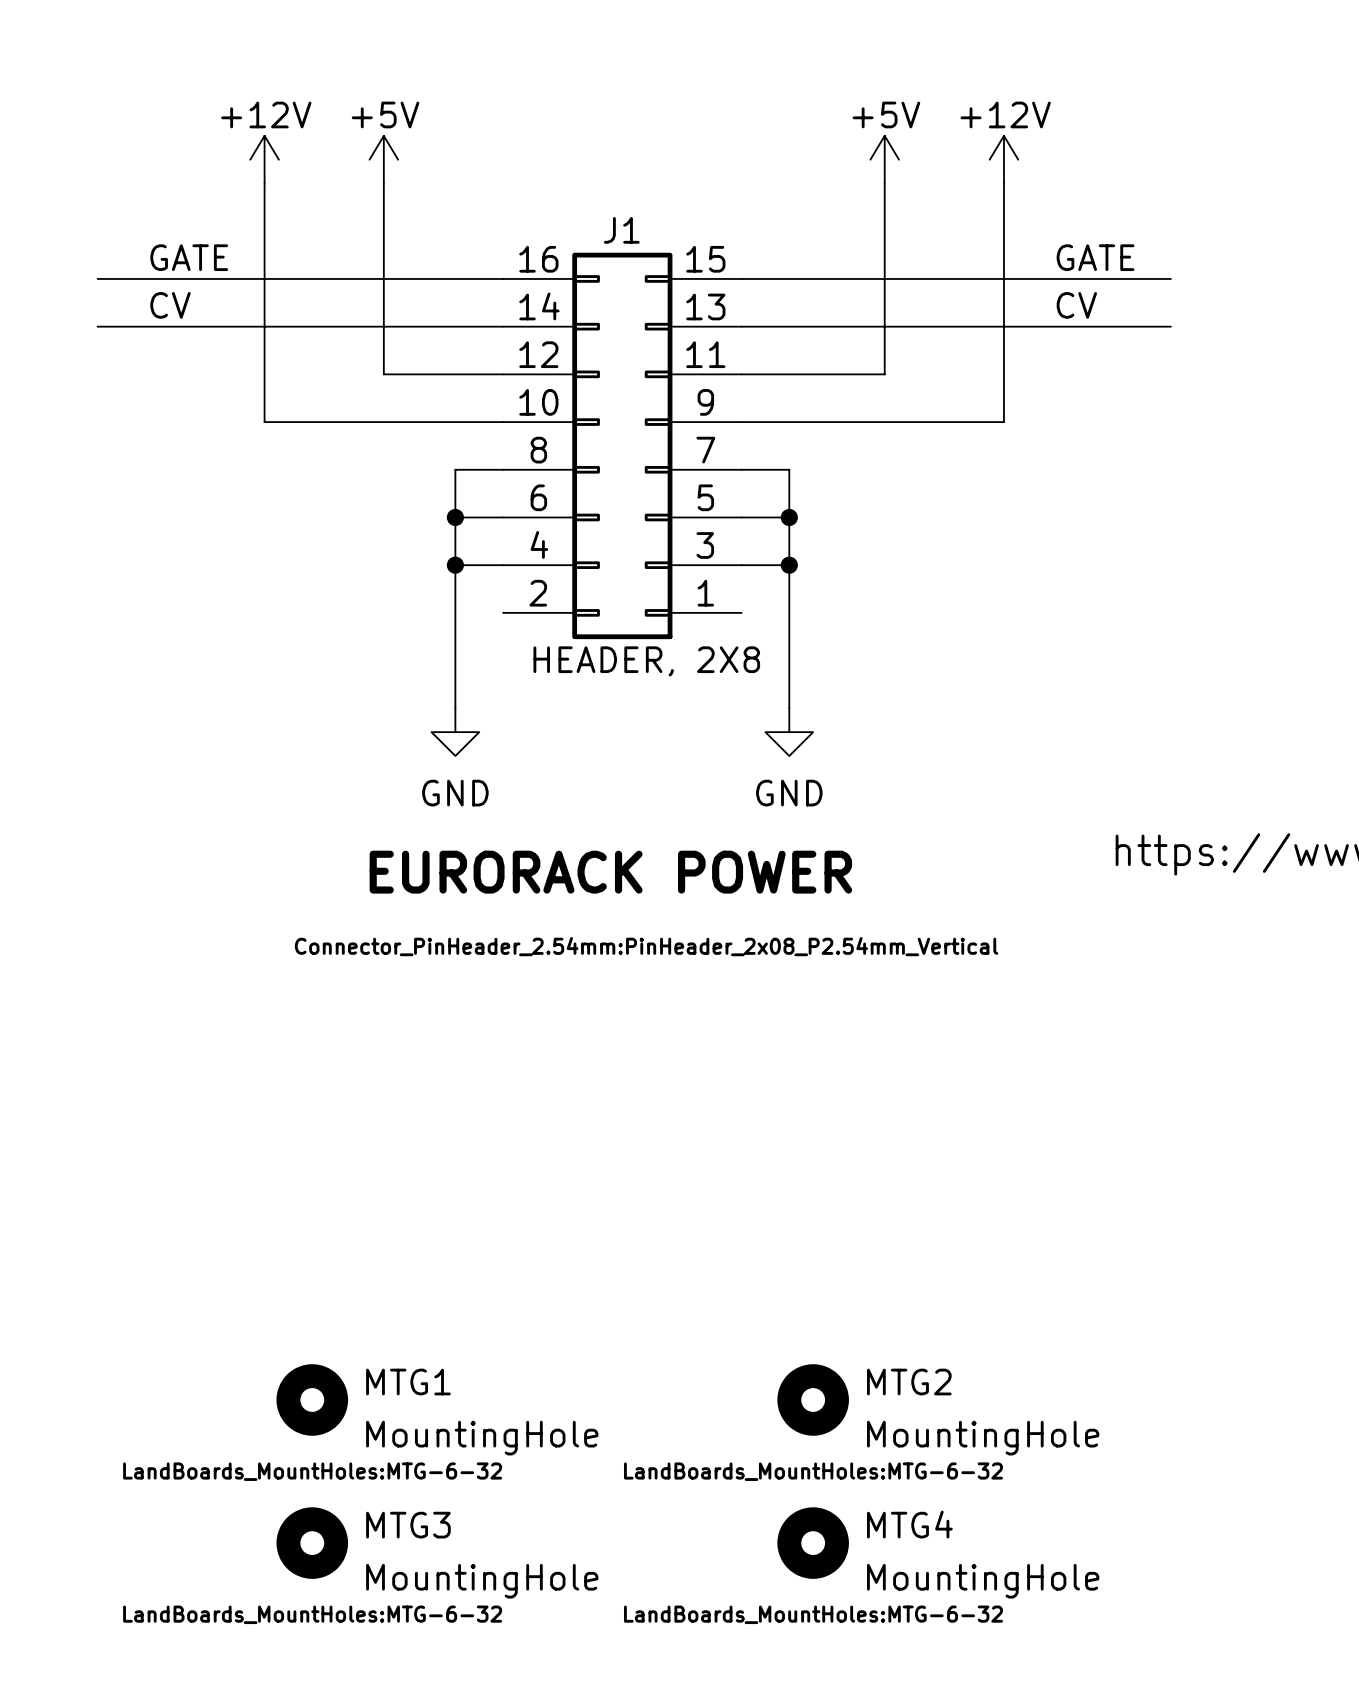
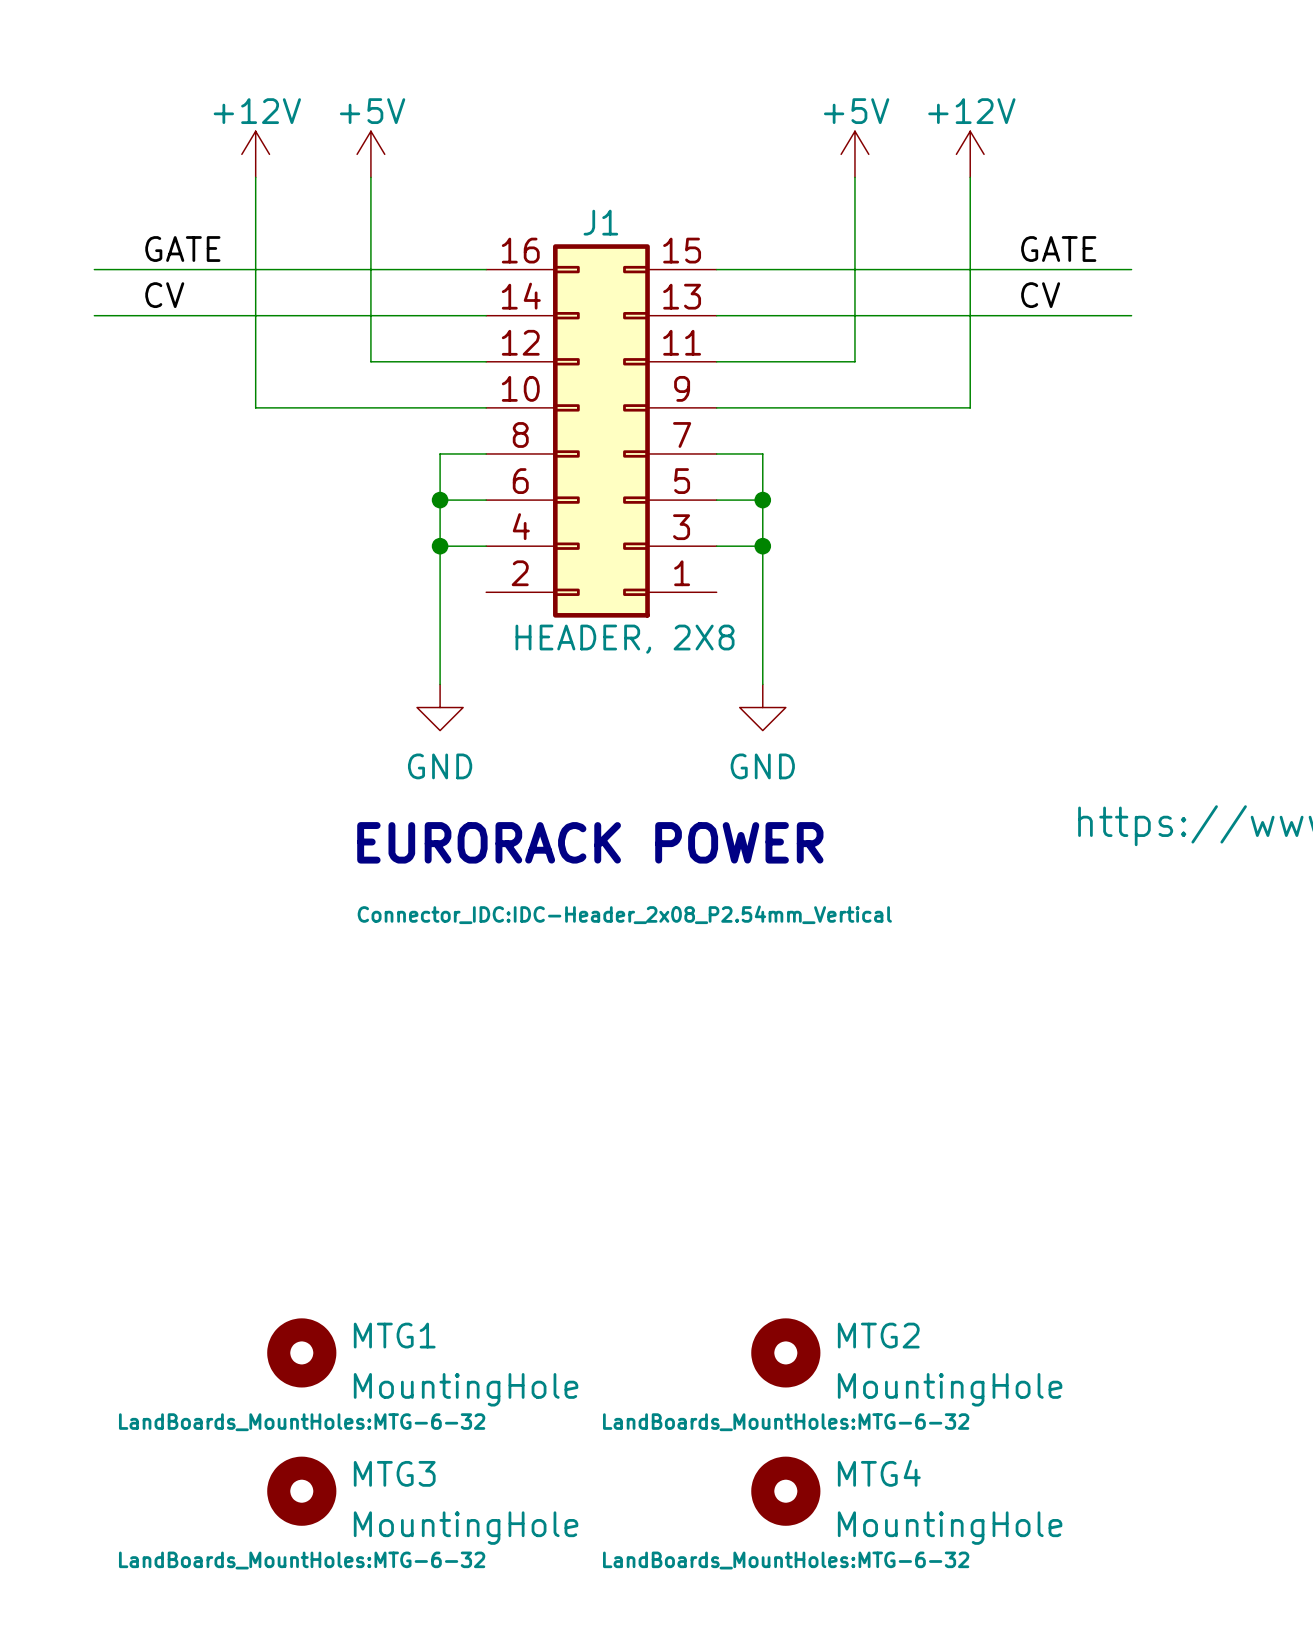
J1 text: Connector_PinHeader_2.54mm:PinHeader_2x08_P2.54mm_Vertical (646, 946) -> Connector_IDC:IDC-Header_2x08_P2.54mm_Vertical (624, 914)

